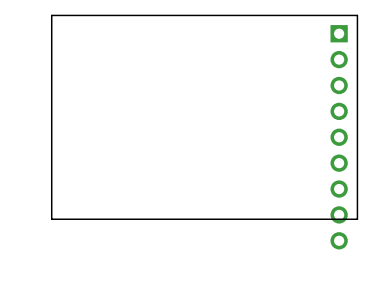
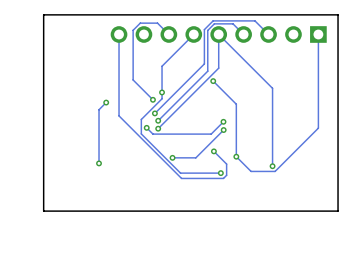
track: none -> (119, 34) (119, 115) (181, 178) (223, 178) (226, 175) (226, 164) (213, 151)
track: none -> (168, 34) (157, 23) (140, 23) (133, 30) (133, 79) (152, 99)
track: none -> (193, 34) (162, 66) (162, 98) (141, 119) (141, 133) (180, 173) (220, 173)
track: none -> (243, 34) (233, 23) (214, 23) (207, 30) (207, 71) (158, 120)
track: none -> (268, 34) (254, 20) (213, 20) (204, 29) (204, 63) (154, 113)
track: none -> (318, 34) (318, 128) (275, 171) (251, 171) (236, 156) (236, 104) (213, 81)
via: none -> (213, 81)
via: none -> (162, 92)
via: none -> (152, 99)
track: none -> (106, 102) (99, 109) (99, 163)
via: none -> (106, 102)
via: none -> (154, 113)
via: none -> (158, 120)
track: none -> (223, 121) (211, 134) (152, 134) (146, 127)
via: none -> (223, 121)
via: none -> (146, 127)
track: none -> (158, 128) (218, 68) (218, 34) (272, 88) (272, 166)
via: none -> (158, 128)
track: none -> (223, 130) (195, 157) (172, 157)
via: none -> (223, 130)
part rotation: 0° (339, 137) -> 90° clockwise (218, 34)
part position: (339, 137) -> (218, 34)
via: none -> (213, 151)
via: none -> (236, 156)
via: none -> (172, 157)
via: none -> (99, 163)
via: none -> (272, 166)
via: none -> (220, 173)

